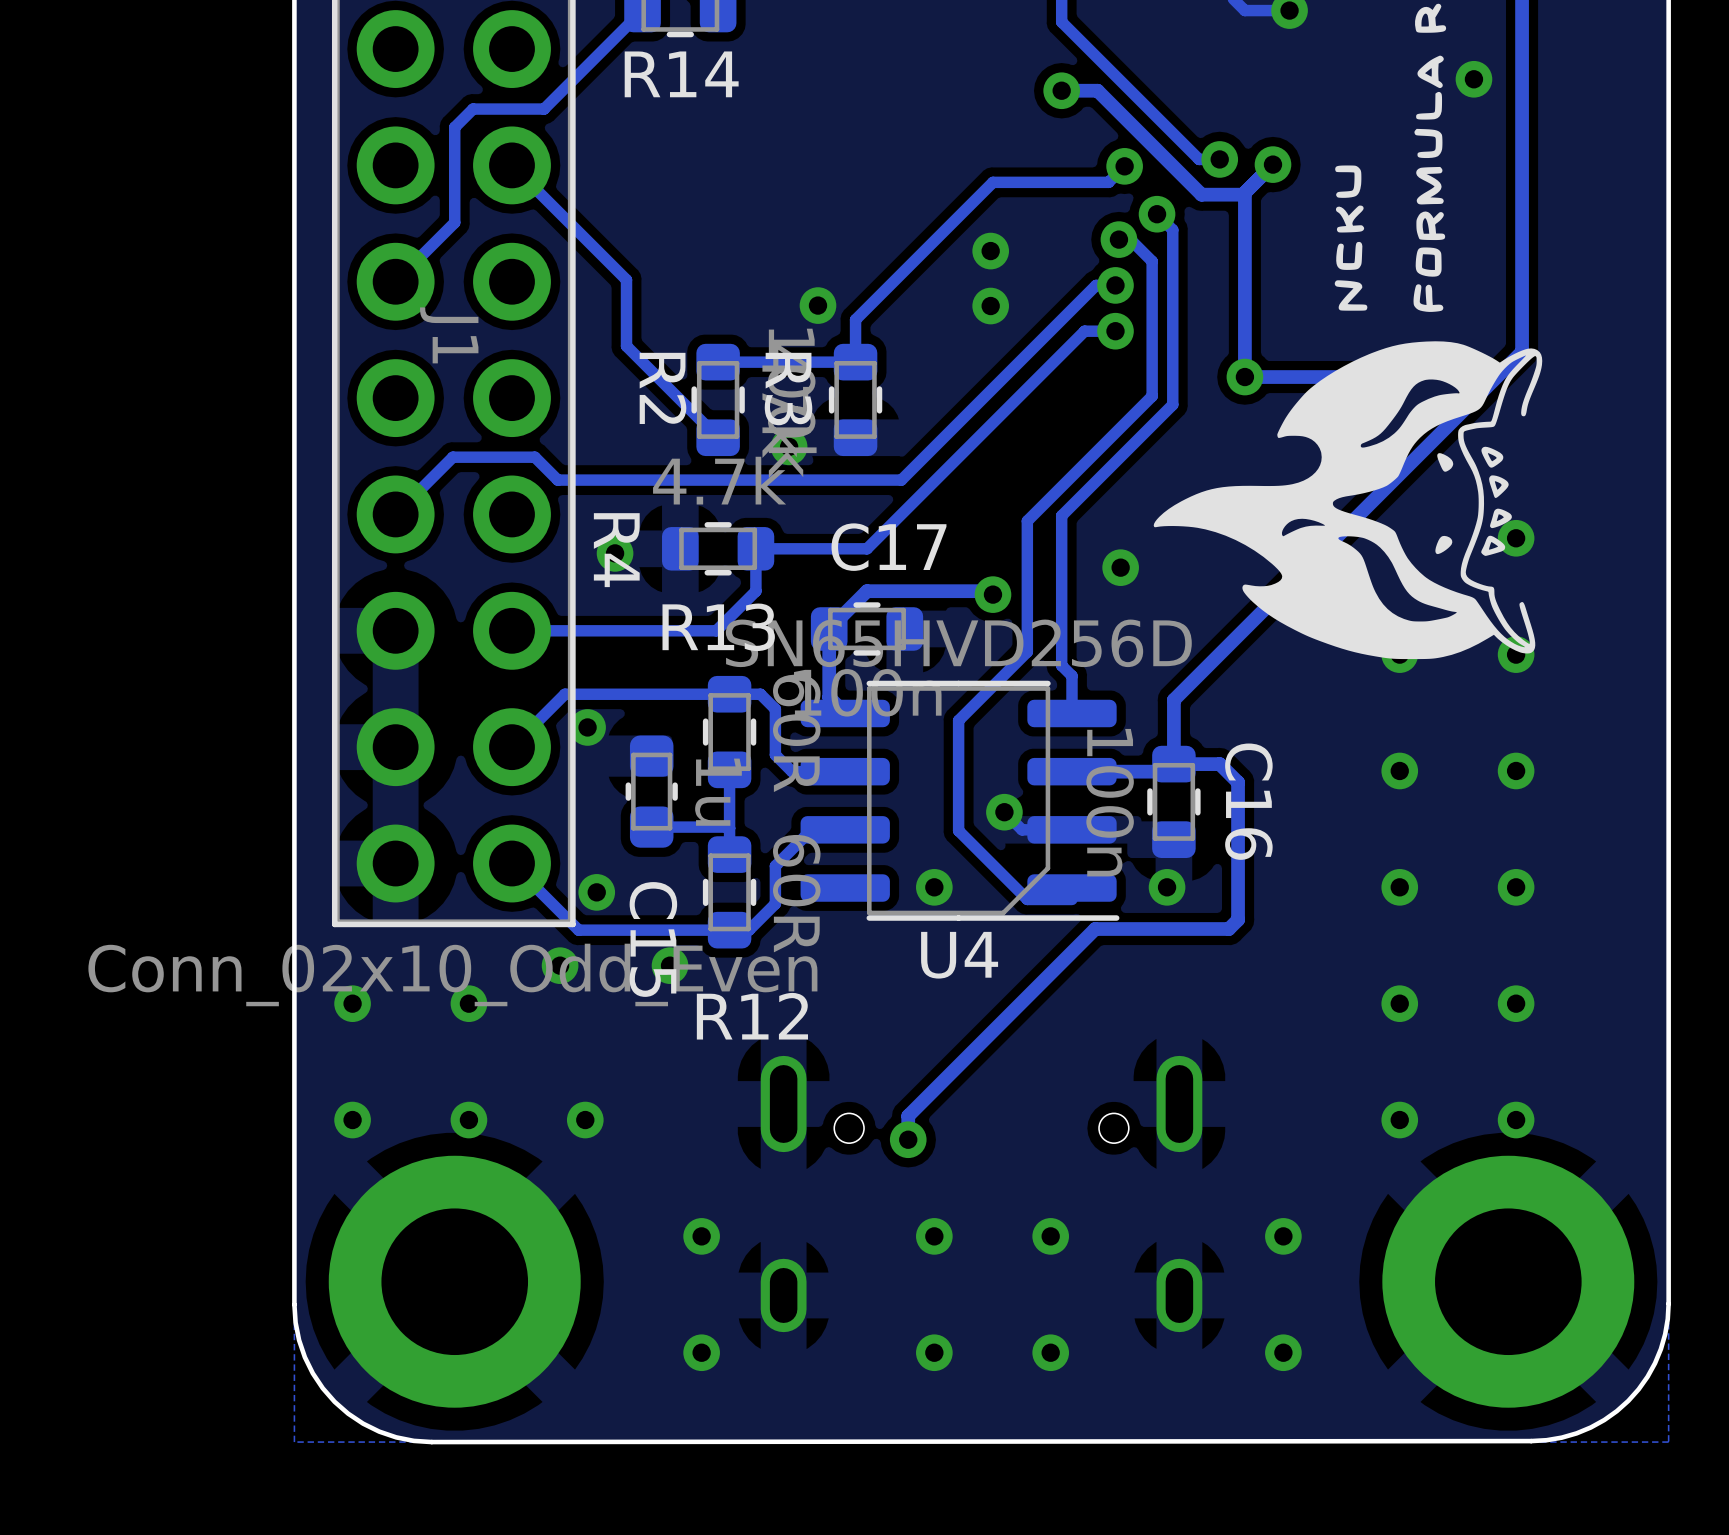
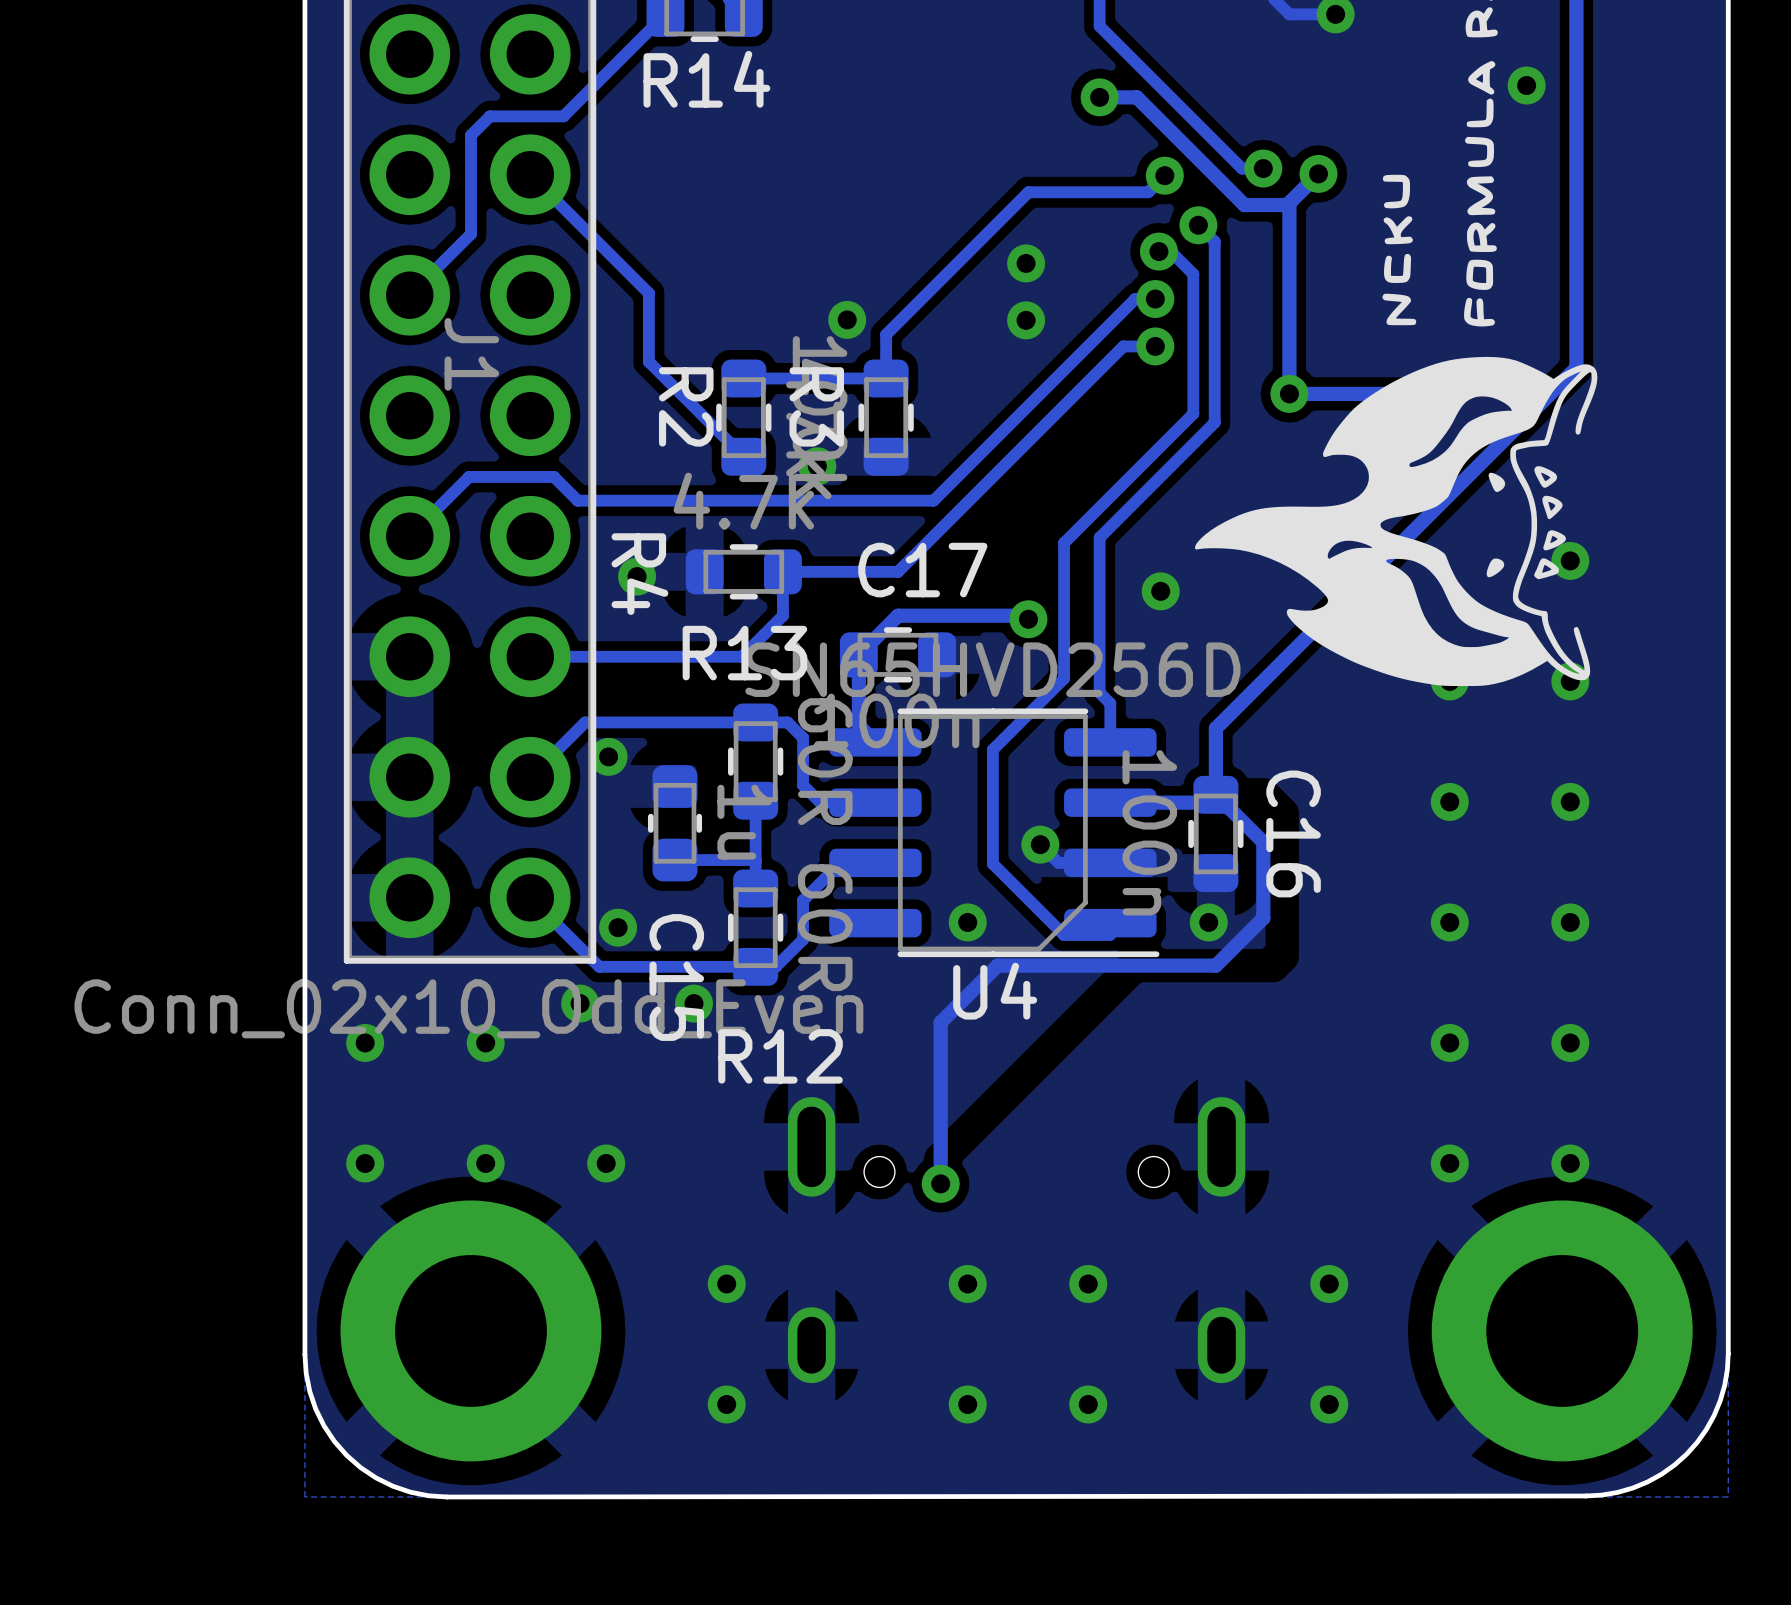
track: (1173, 764) (1219, 764) (1238, 782) (1238, 919) (1228, 929) (1173, 929) -> (1215, 794) (1263, 842) (1263, 918) (1215, 965)
track: (1095, 929) (908, 1116) -> (1134, 965) (997, 965) (940, 1022) (940, 1159)

